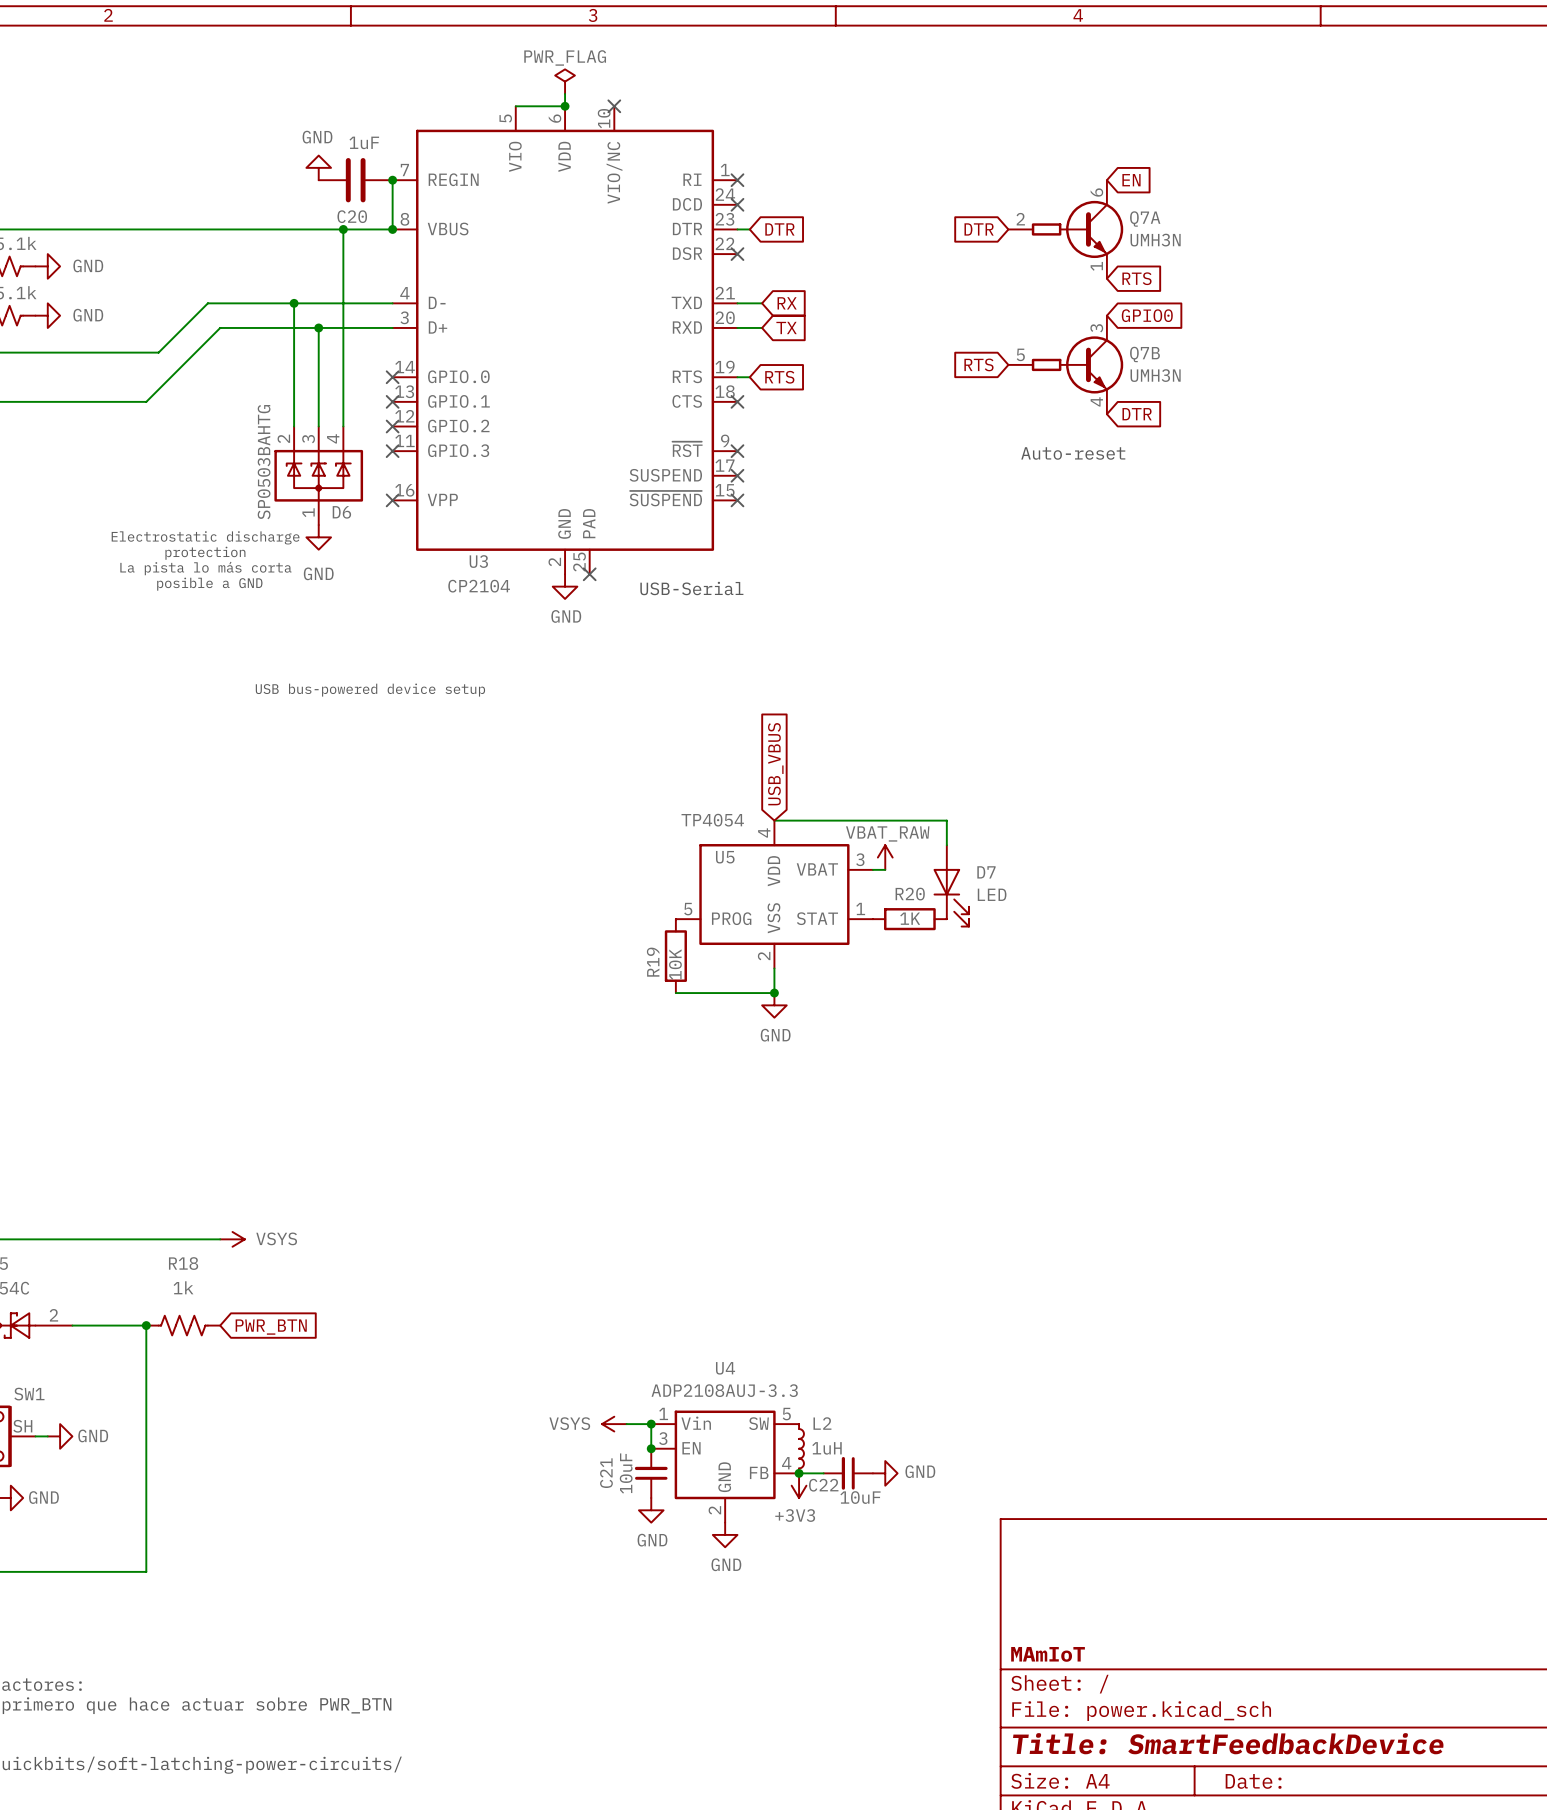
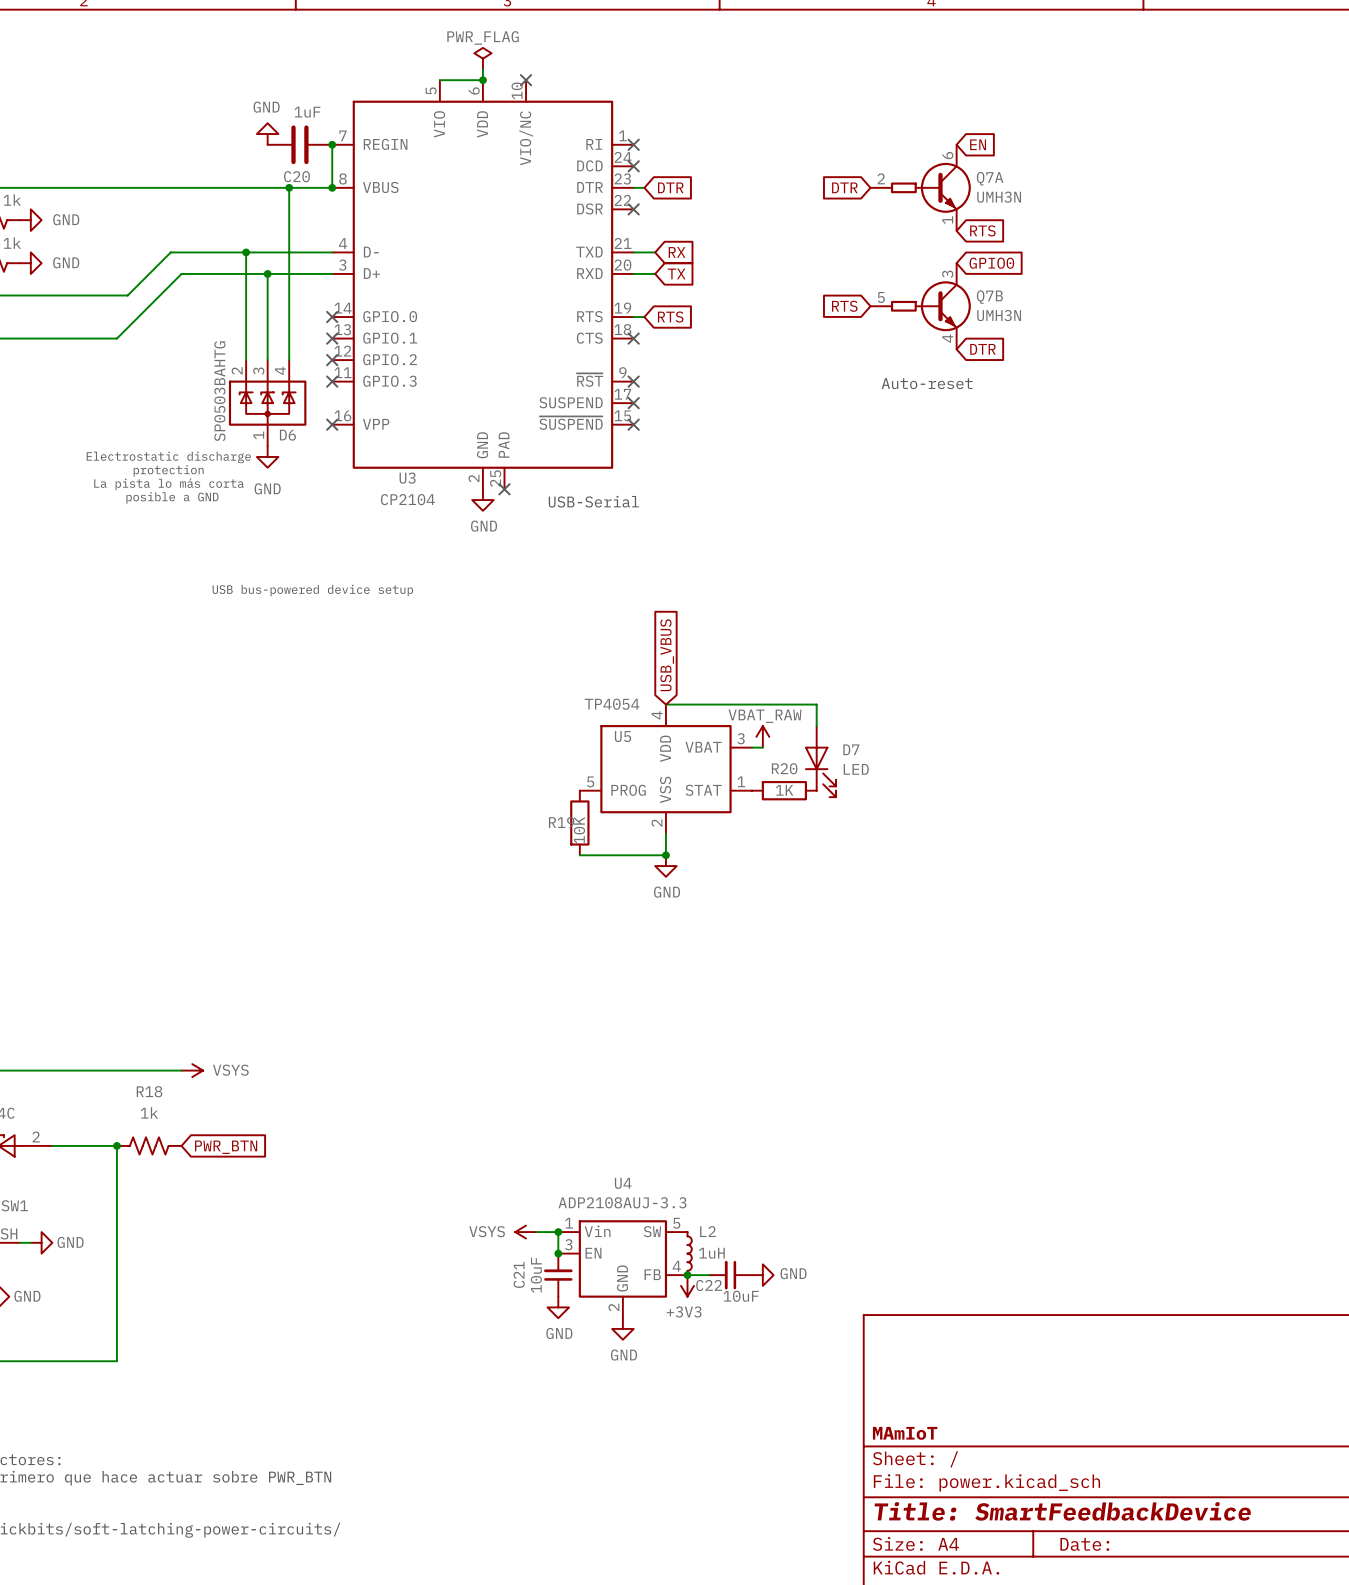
R19 name rotation: 0° (653, 962) -> 90° clockwise (561, 822)

